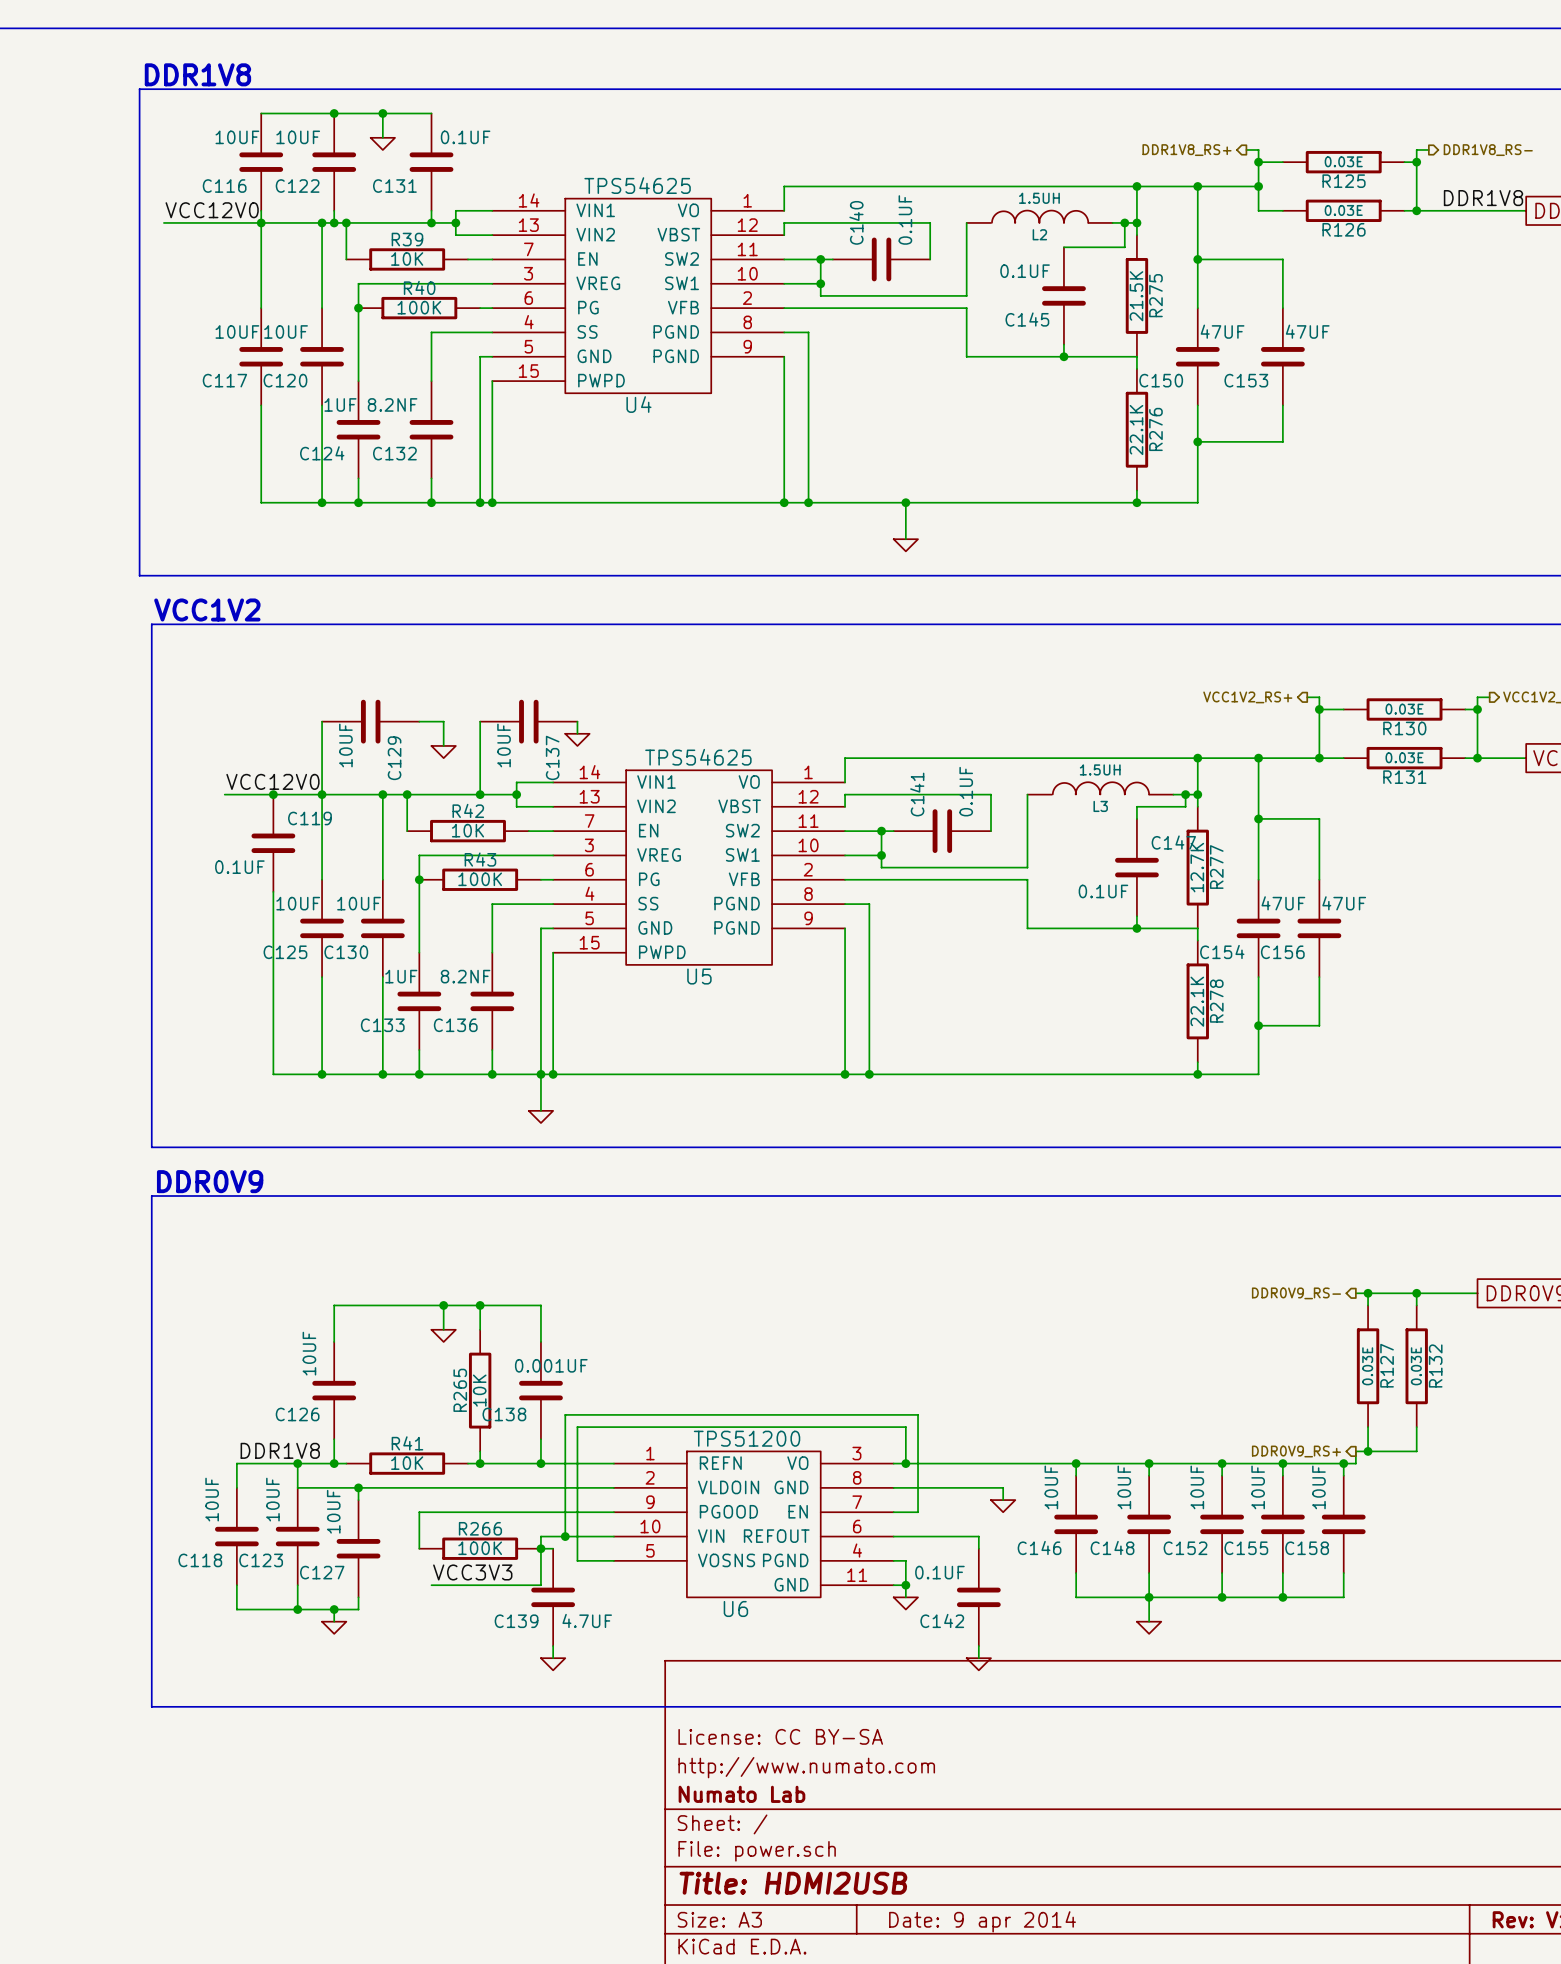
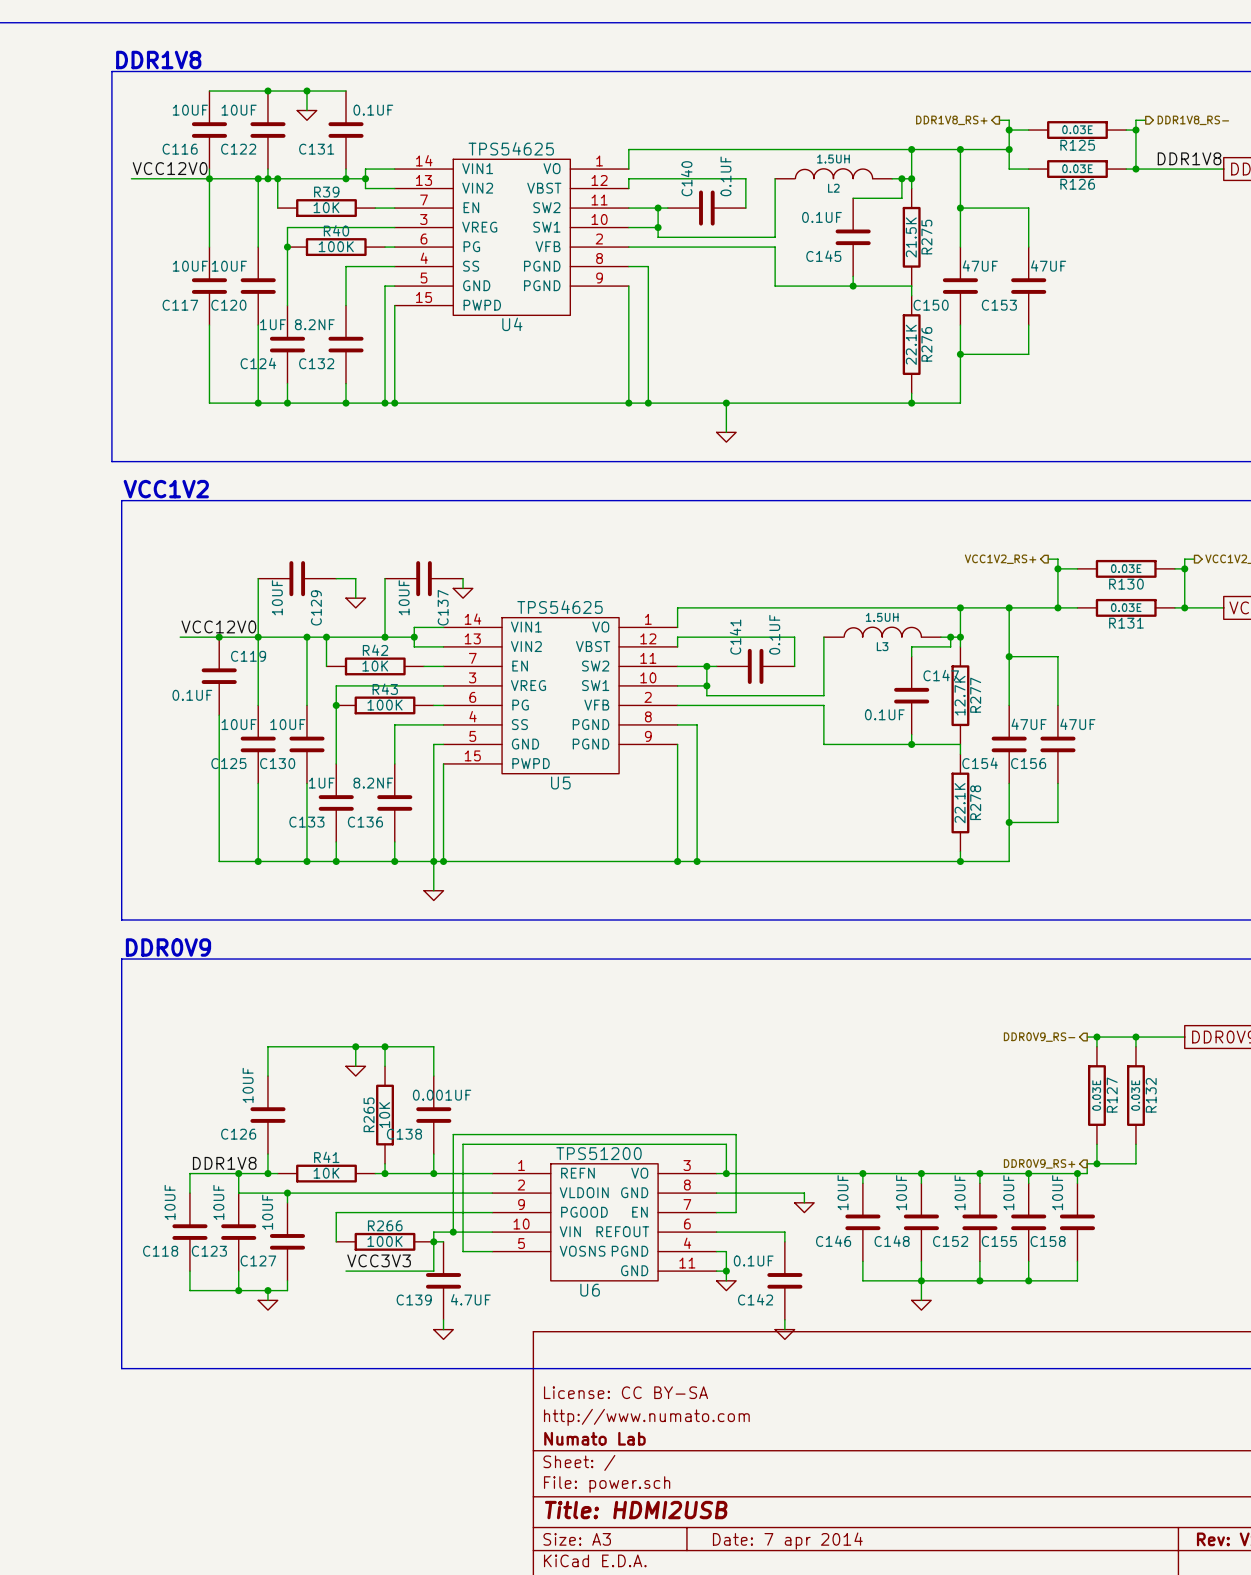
title block: Date: 9 apr 2014 (982, 1921) -> Date: 7 apr 2014 (787, 1541)

